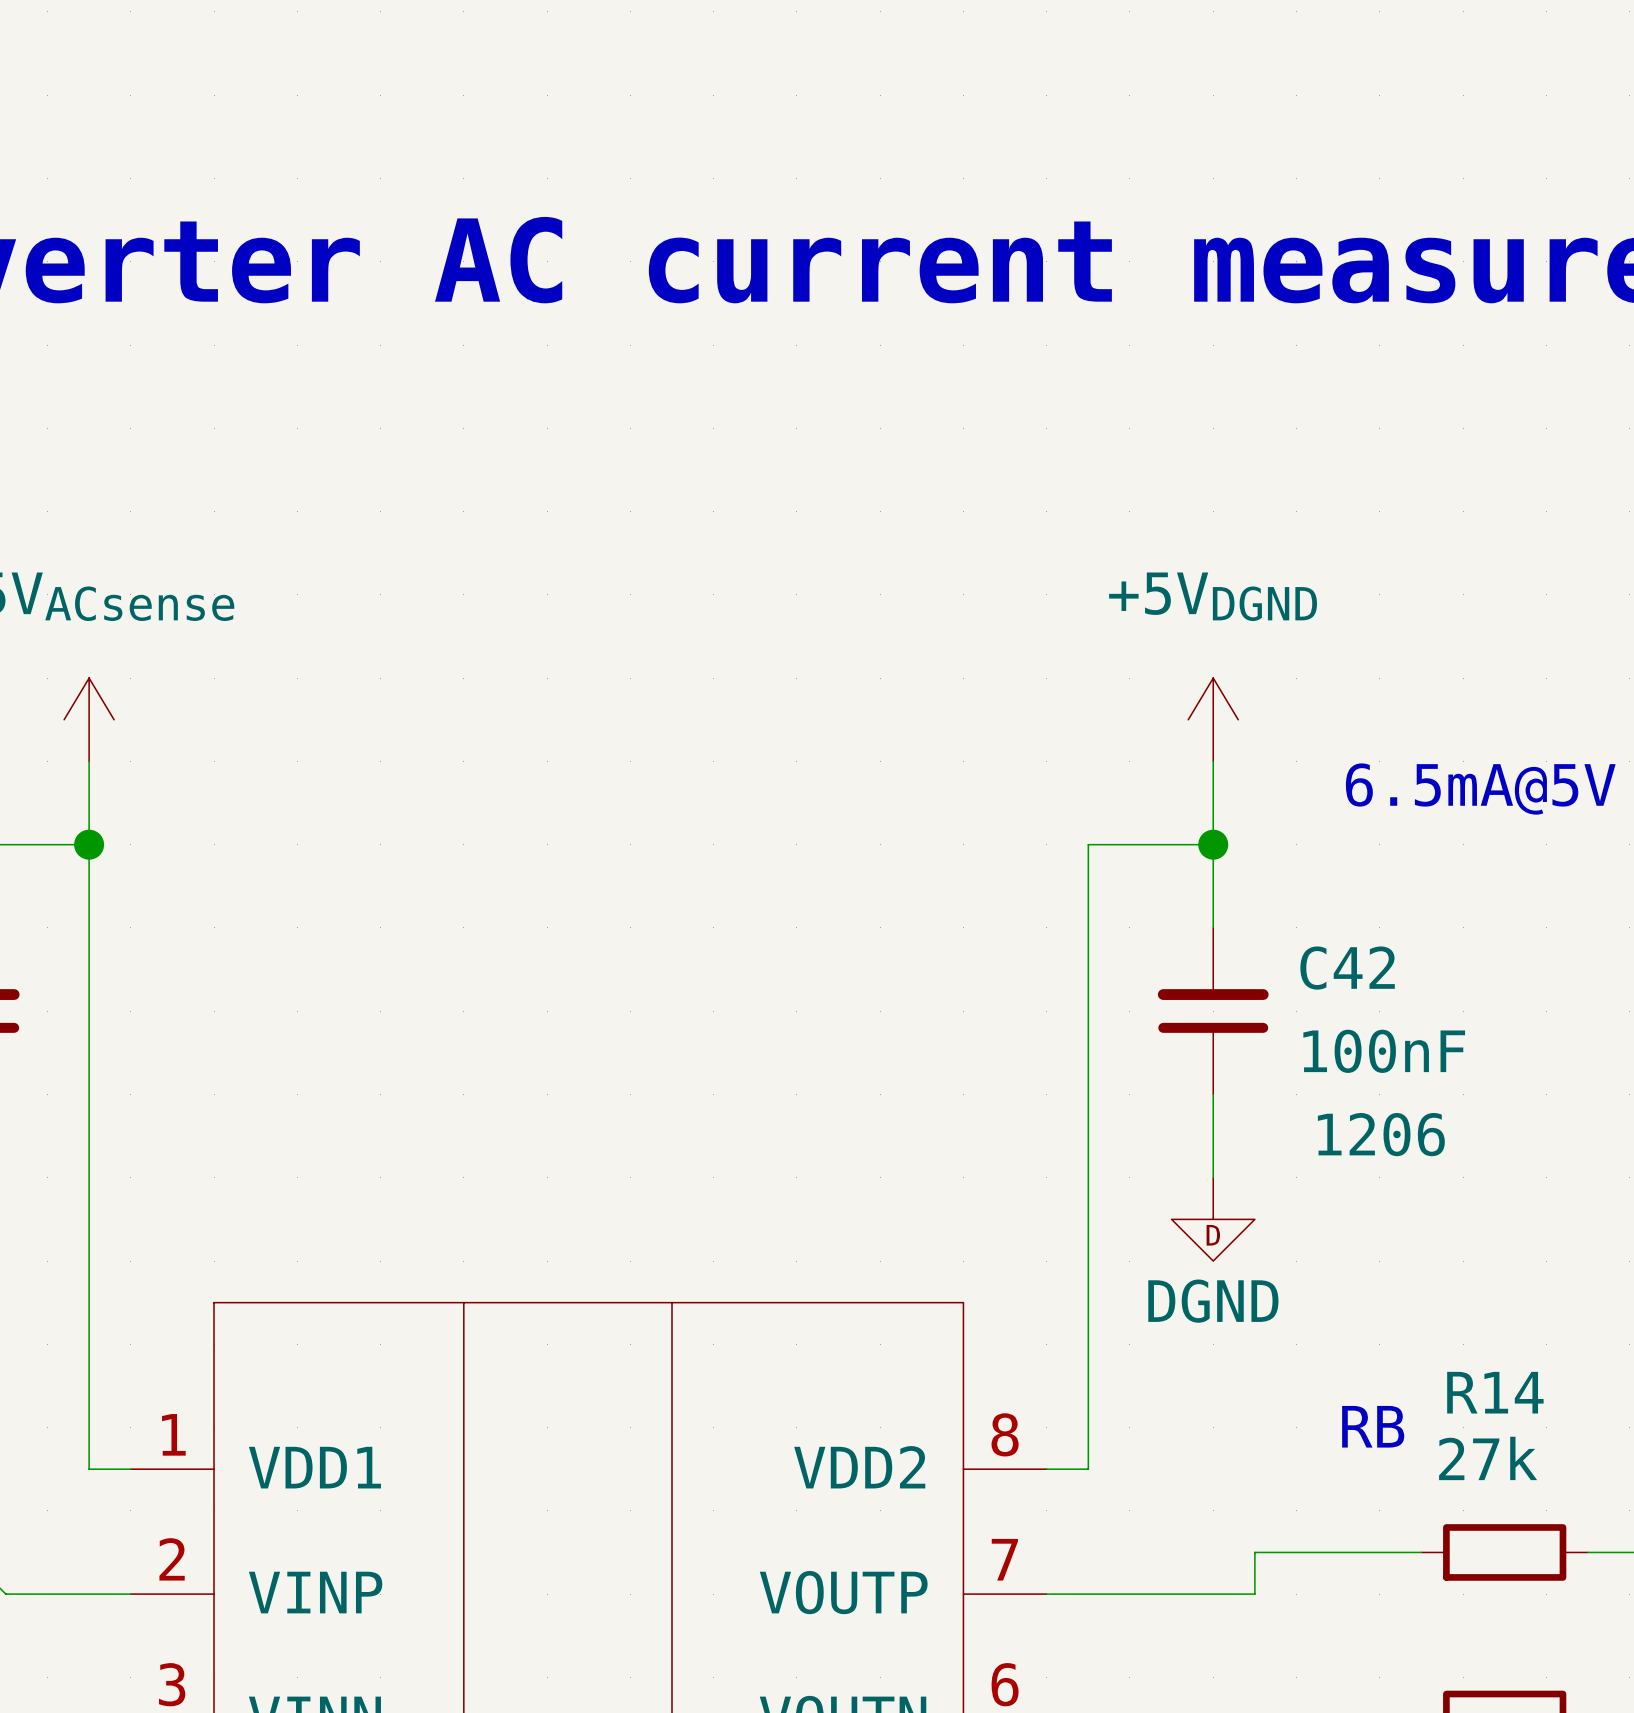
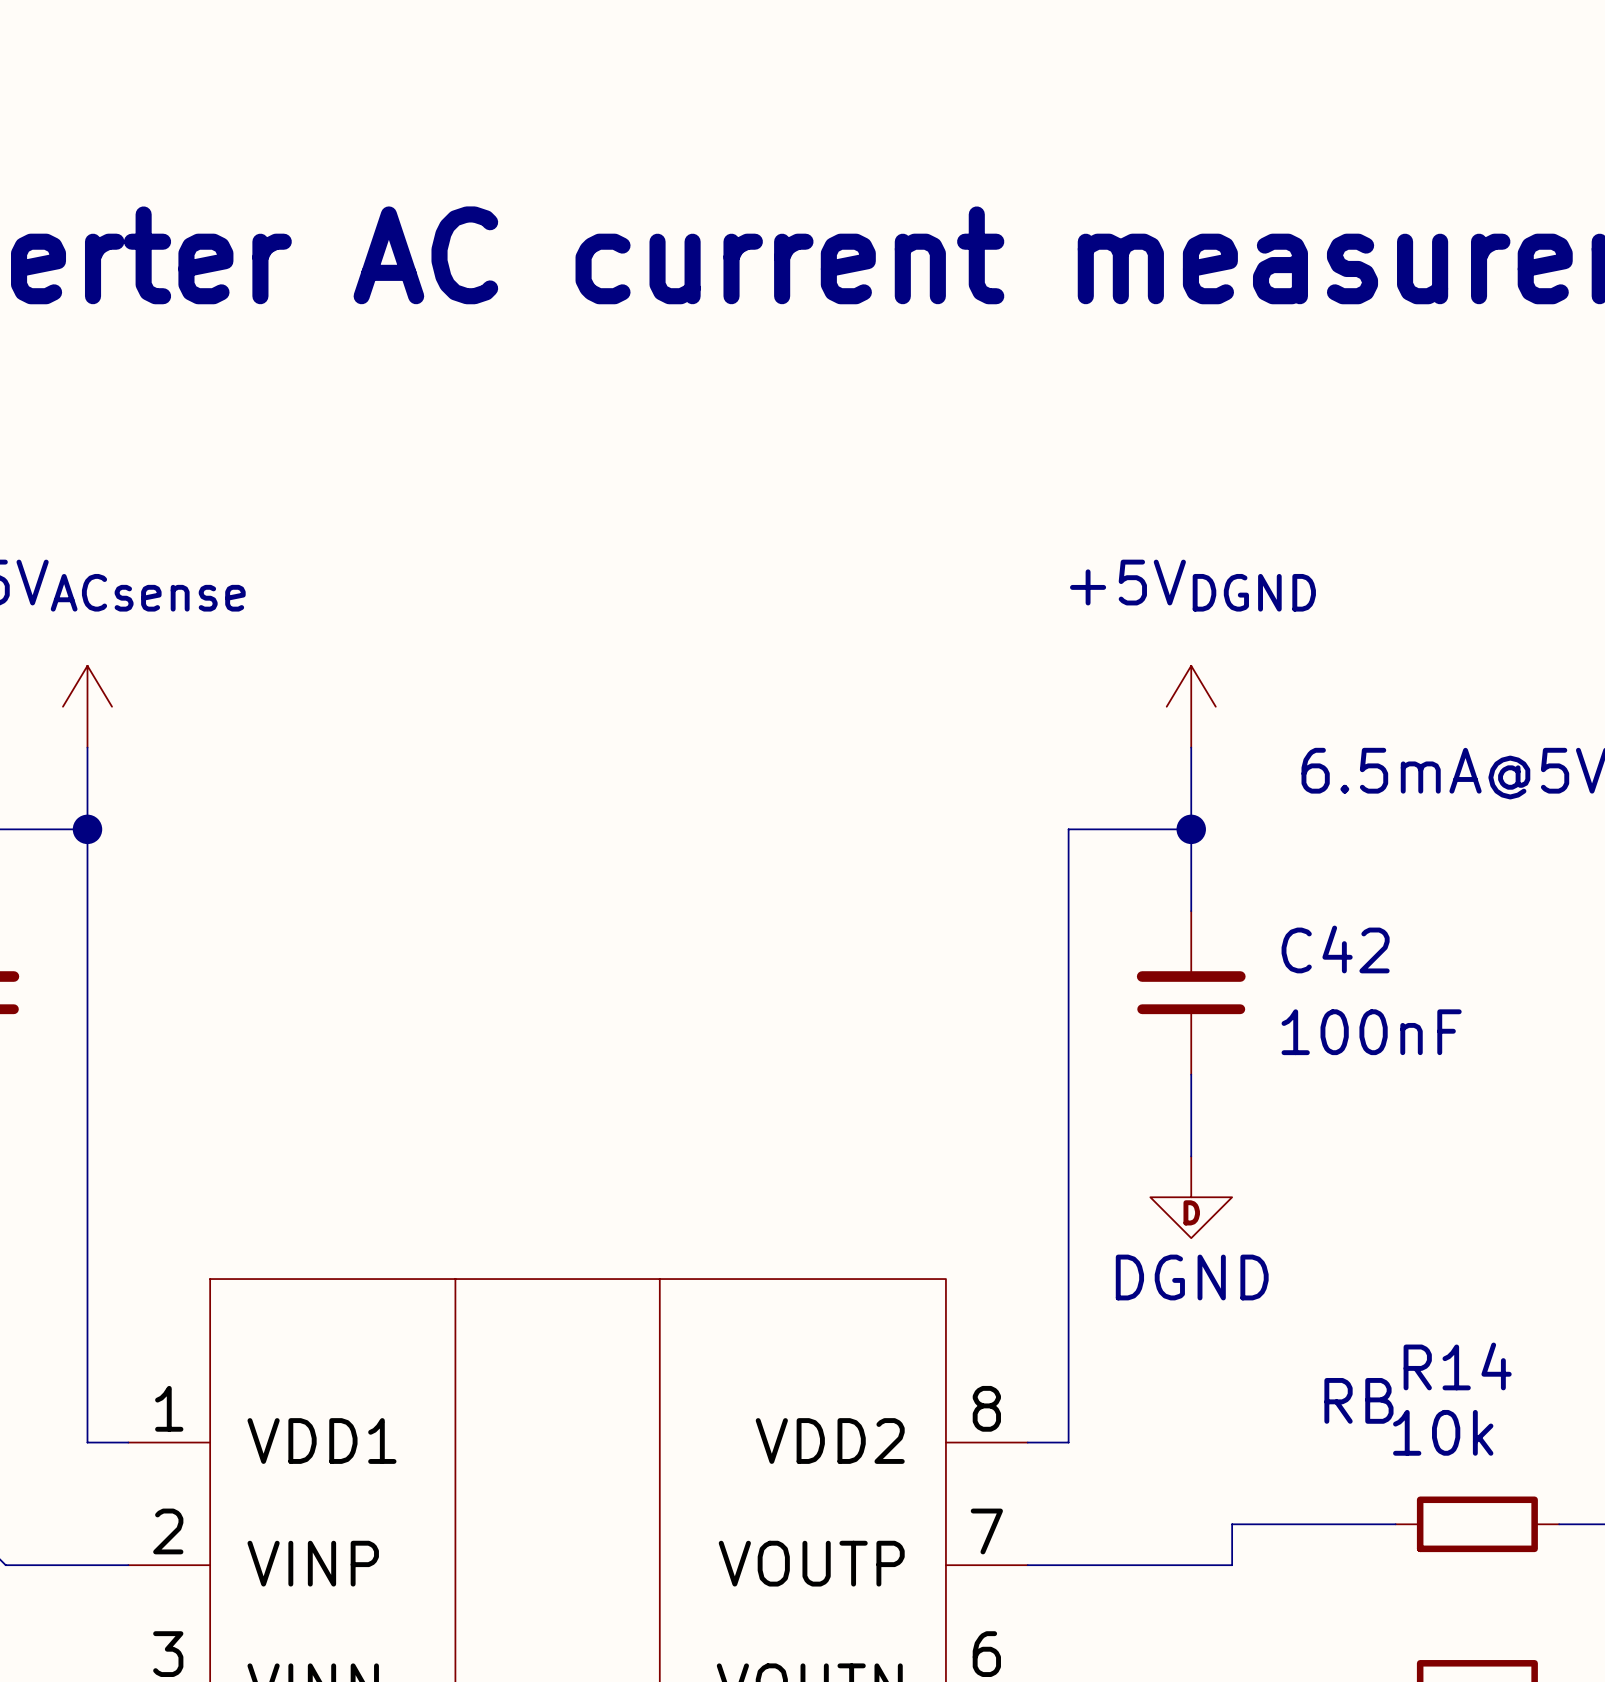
C42 text: 1206 (1381, 1134) -> none
R14 value: 27k (1488, 1458) -> 10k (1443, 1432)

